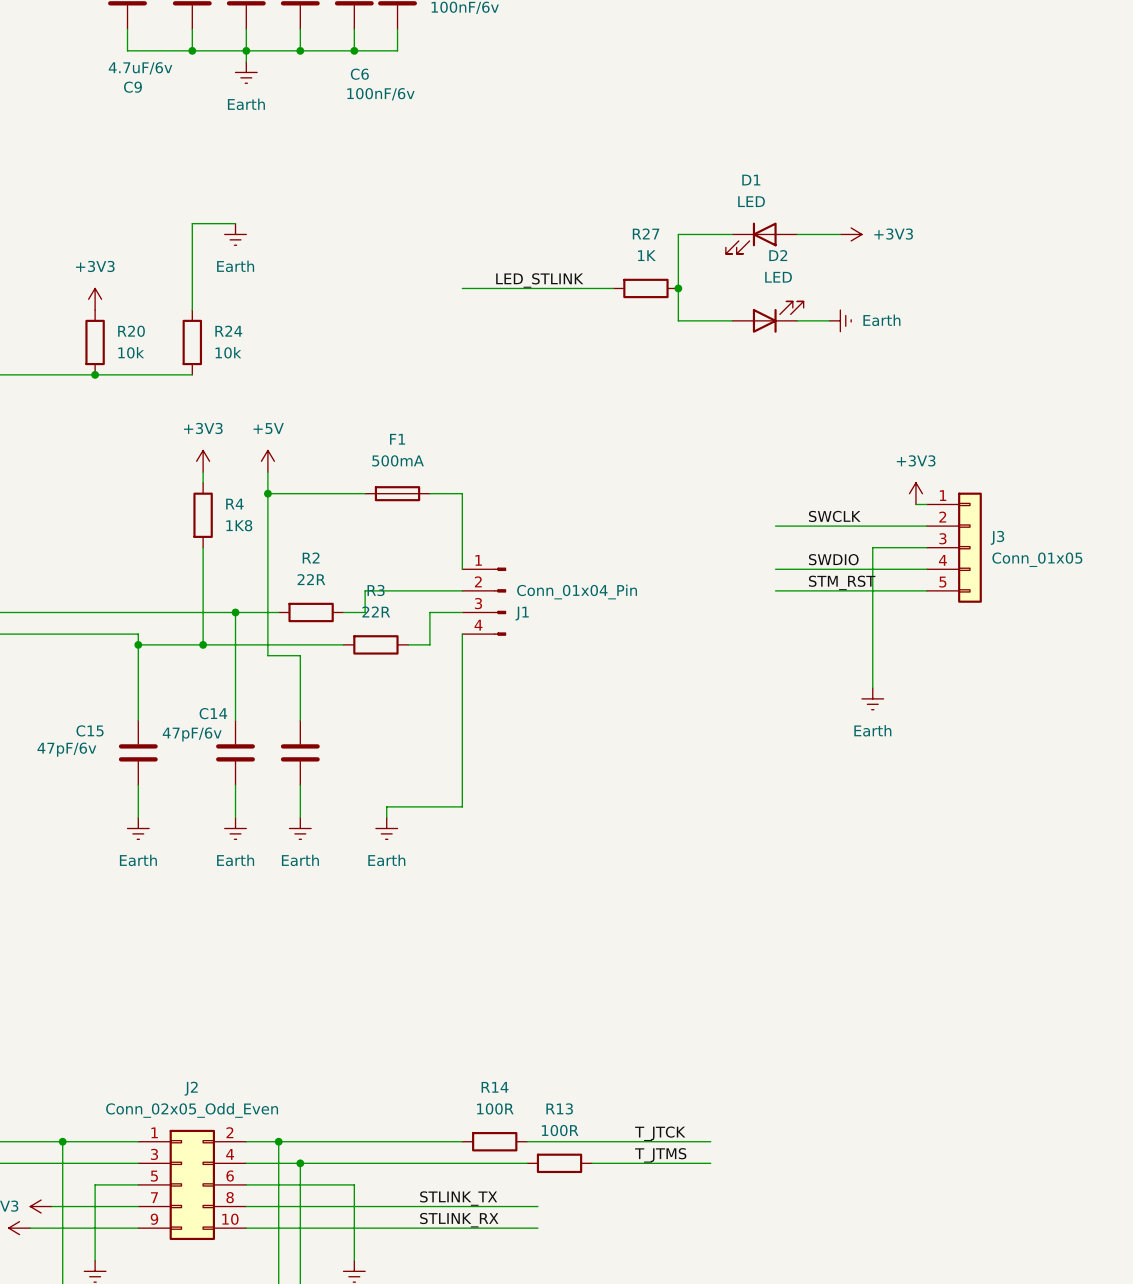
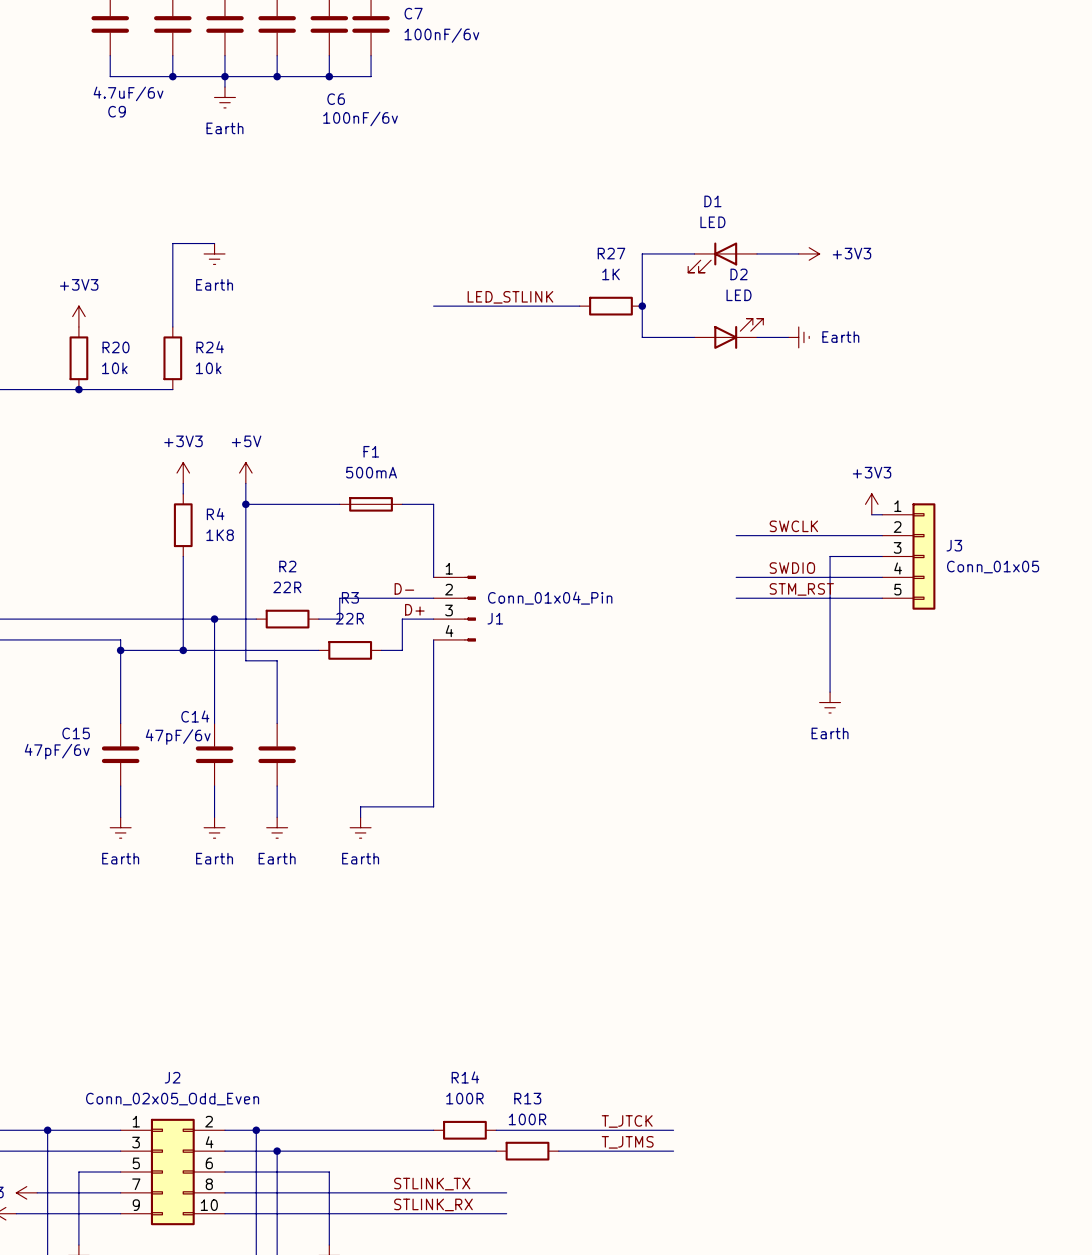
label: none -> D- (404, 588)
label: none -> D+ (414, 609)

